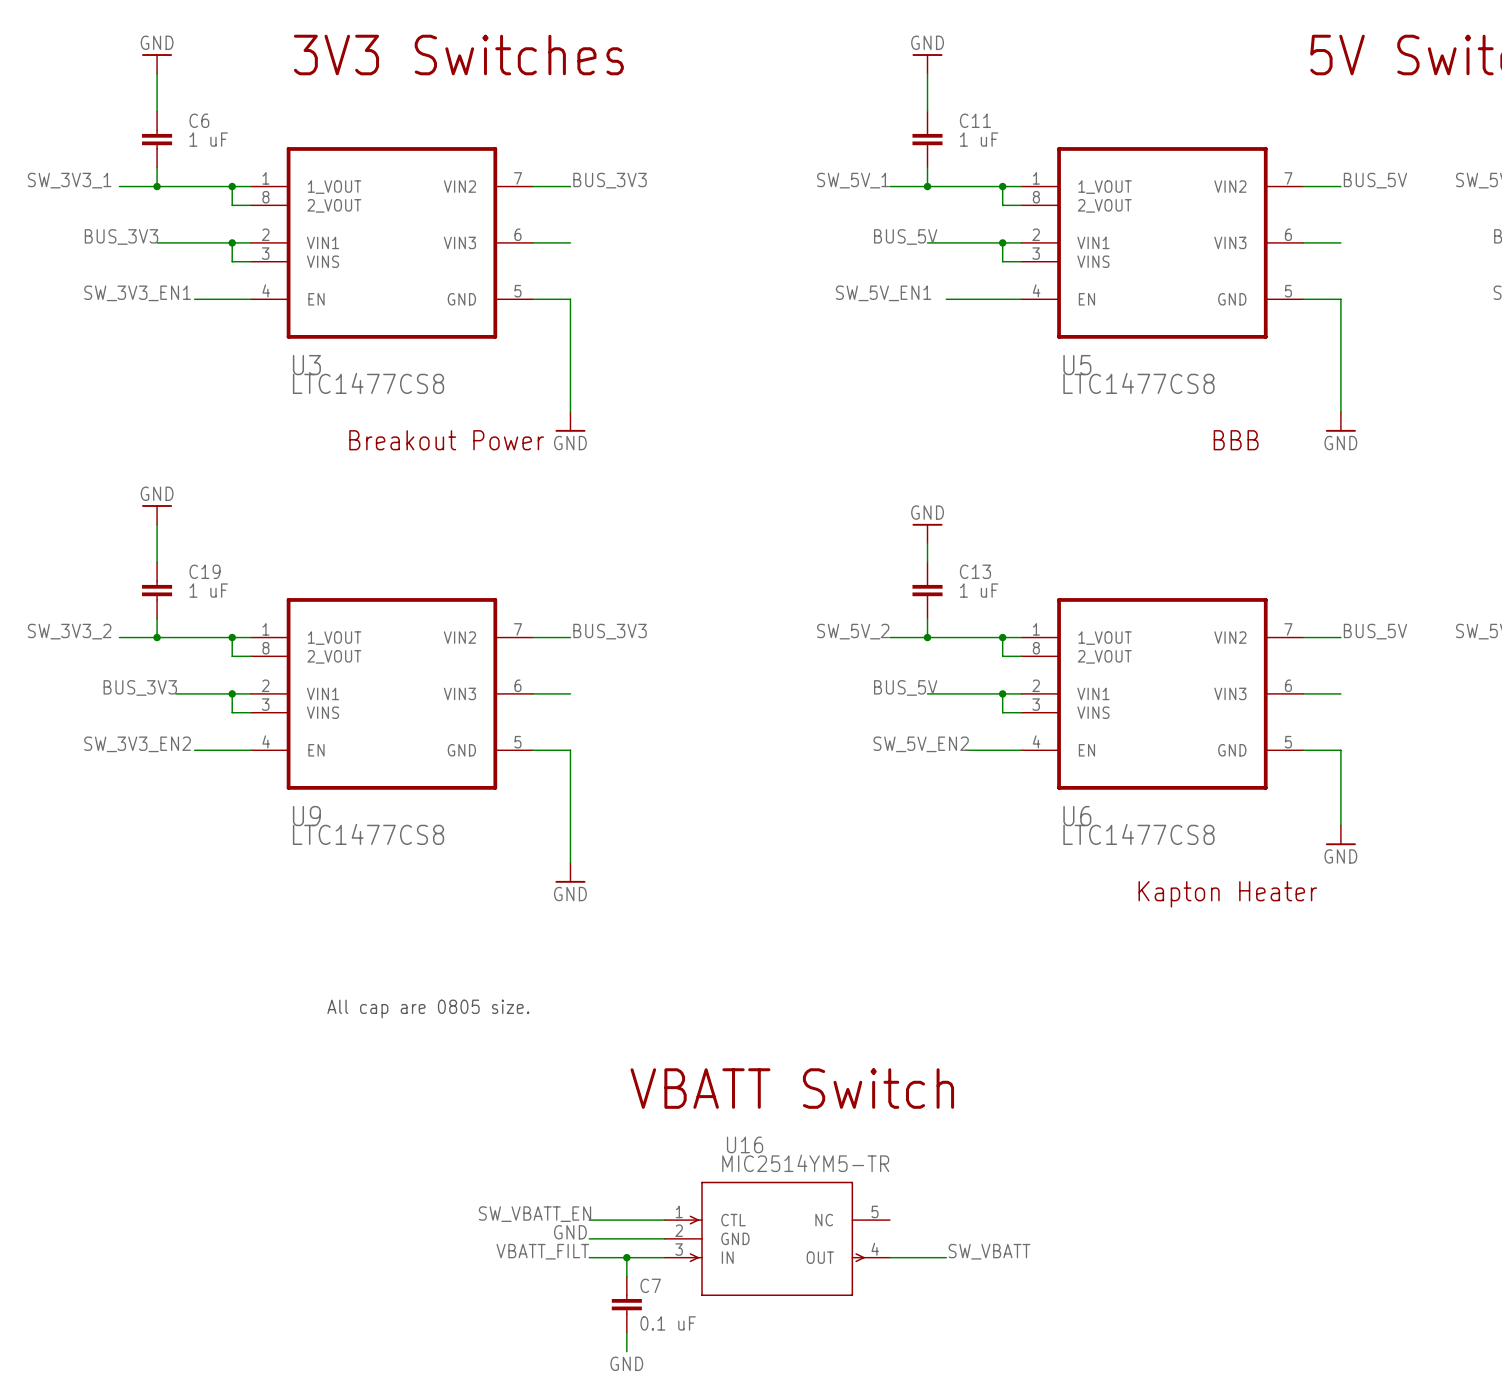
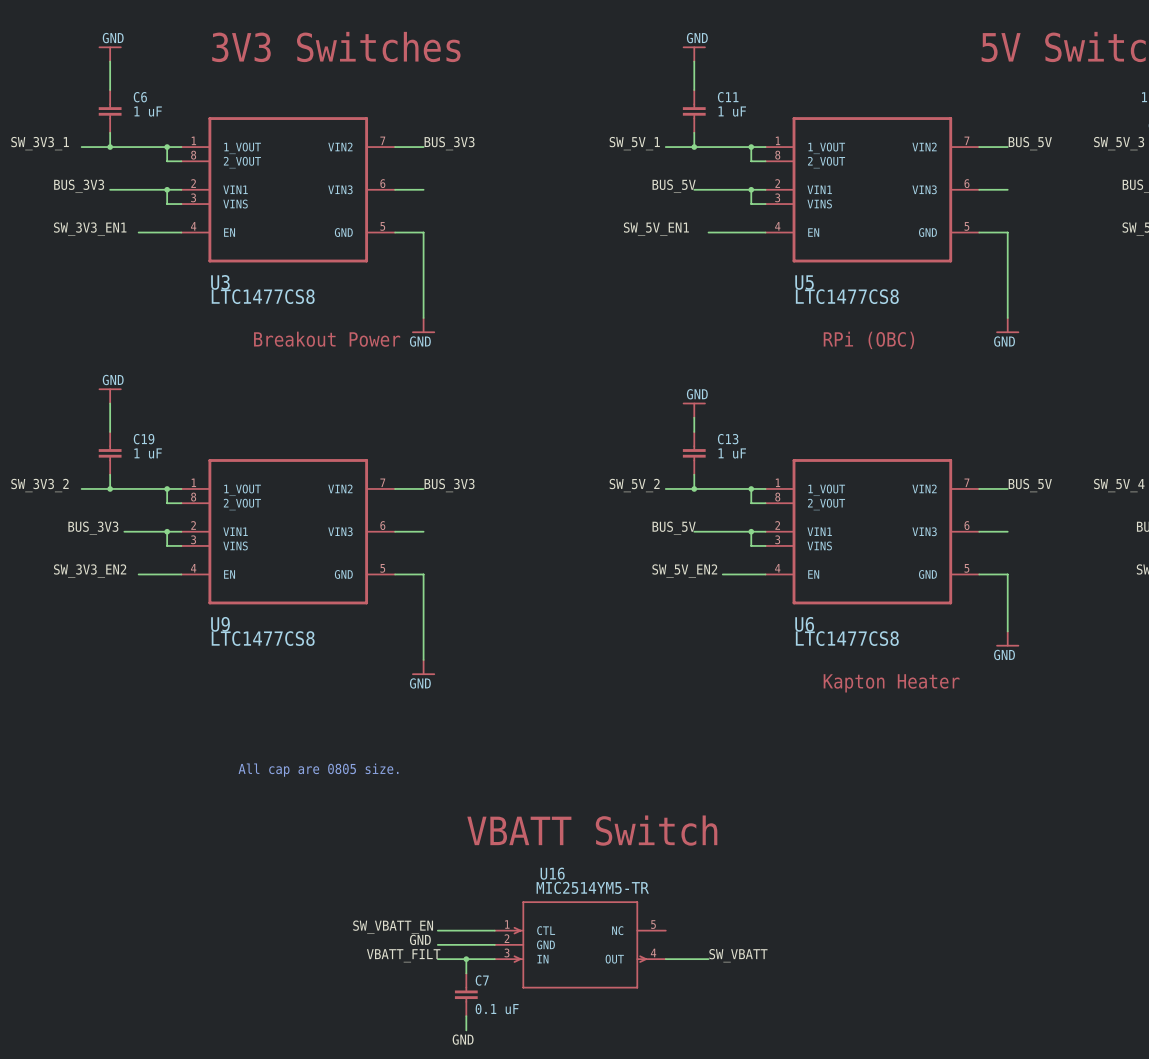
text: BBB (1236, 440) -> none
text: none -> RPi (OBC) (868, 340)
text position: Kapton Heater (1227, 894) -> Kapton Heater (891, 683)

